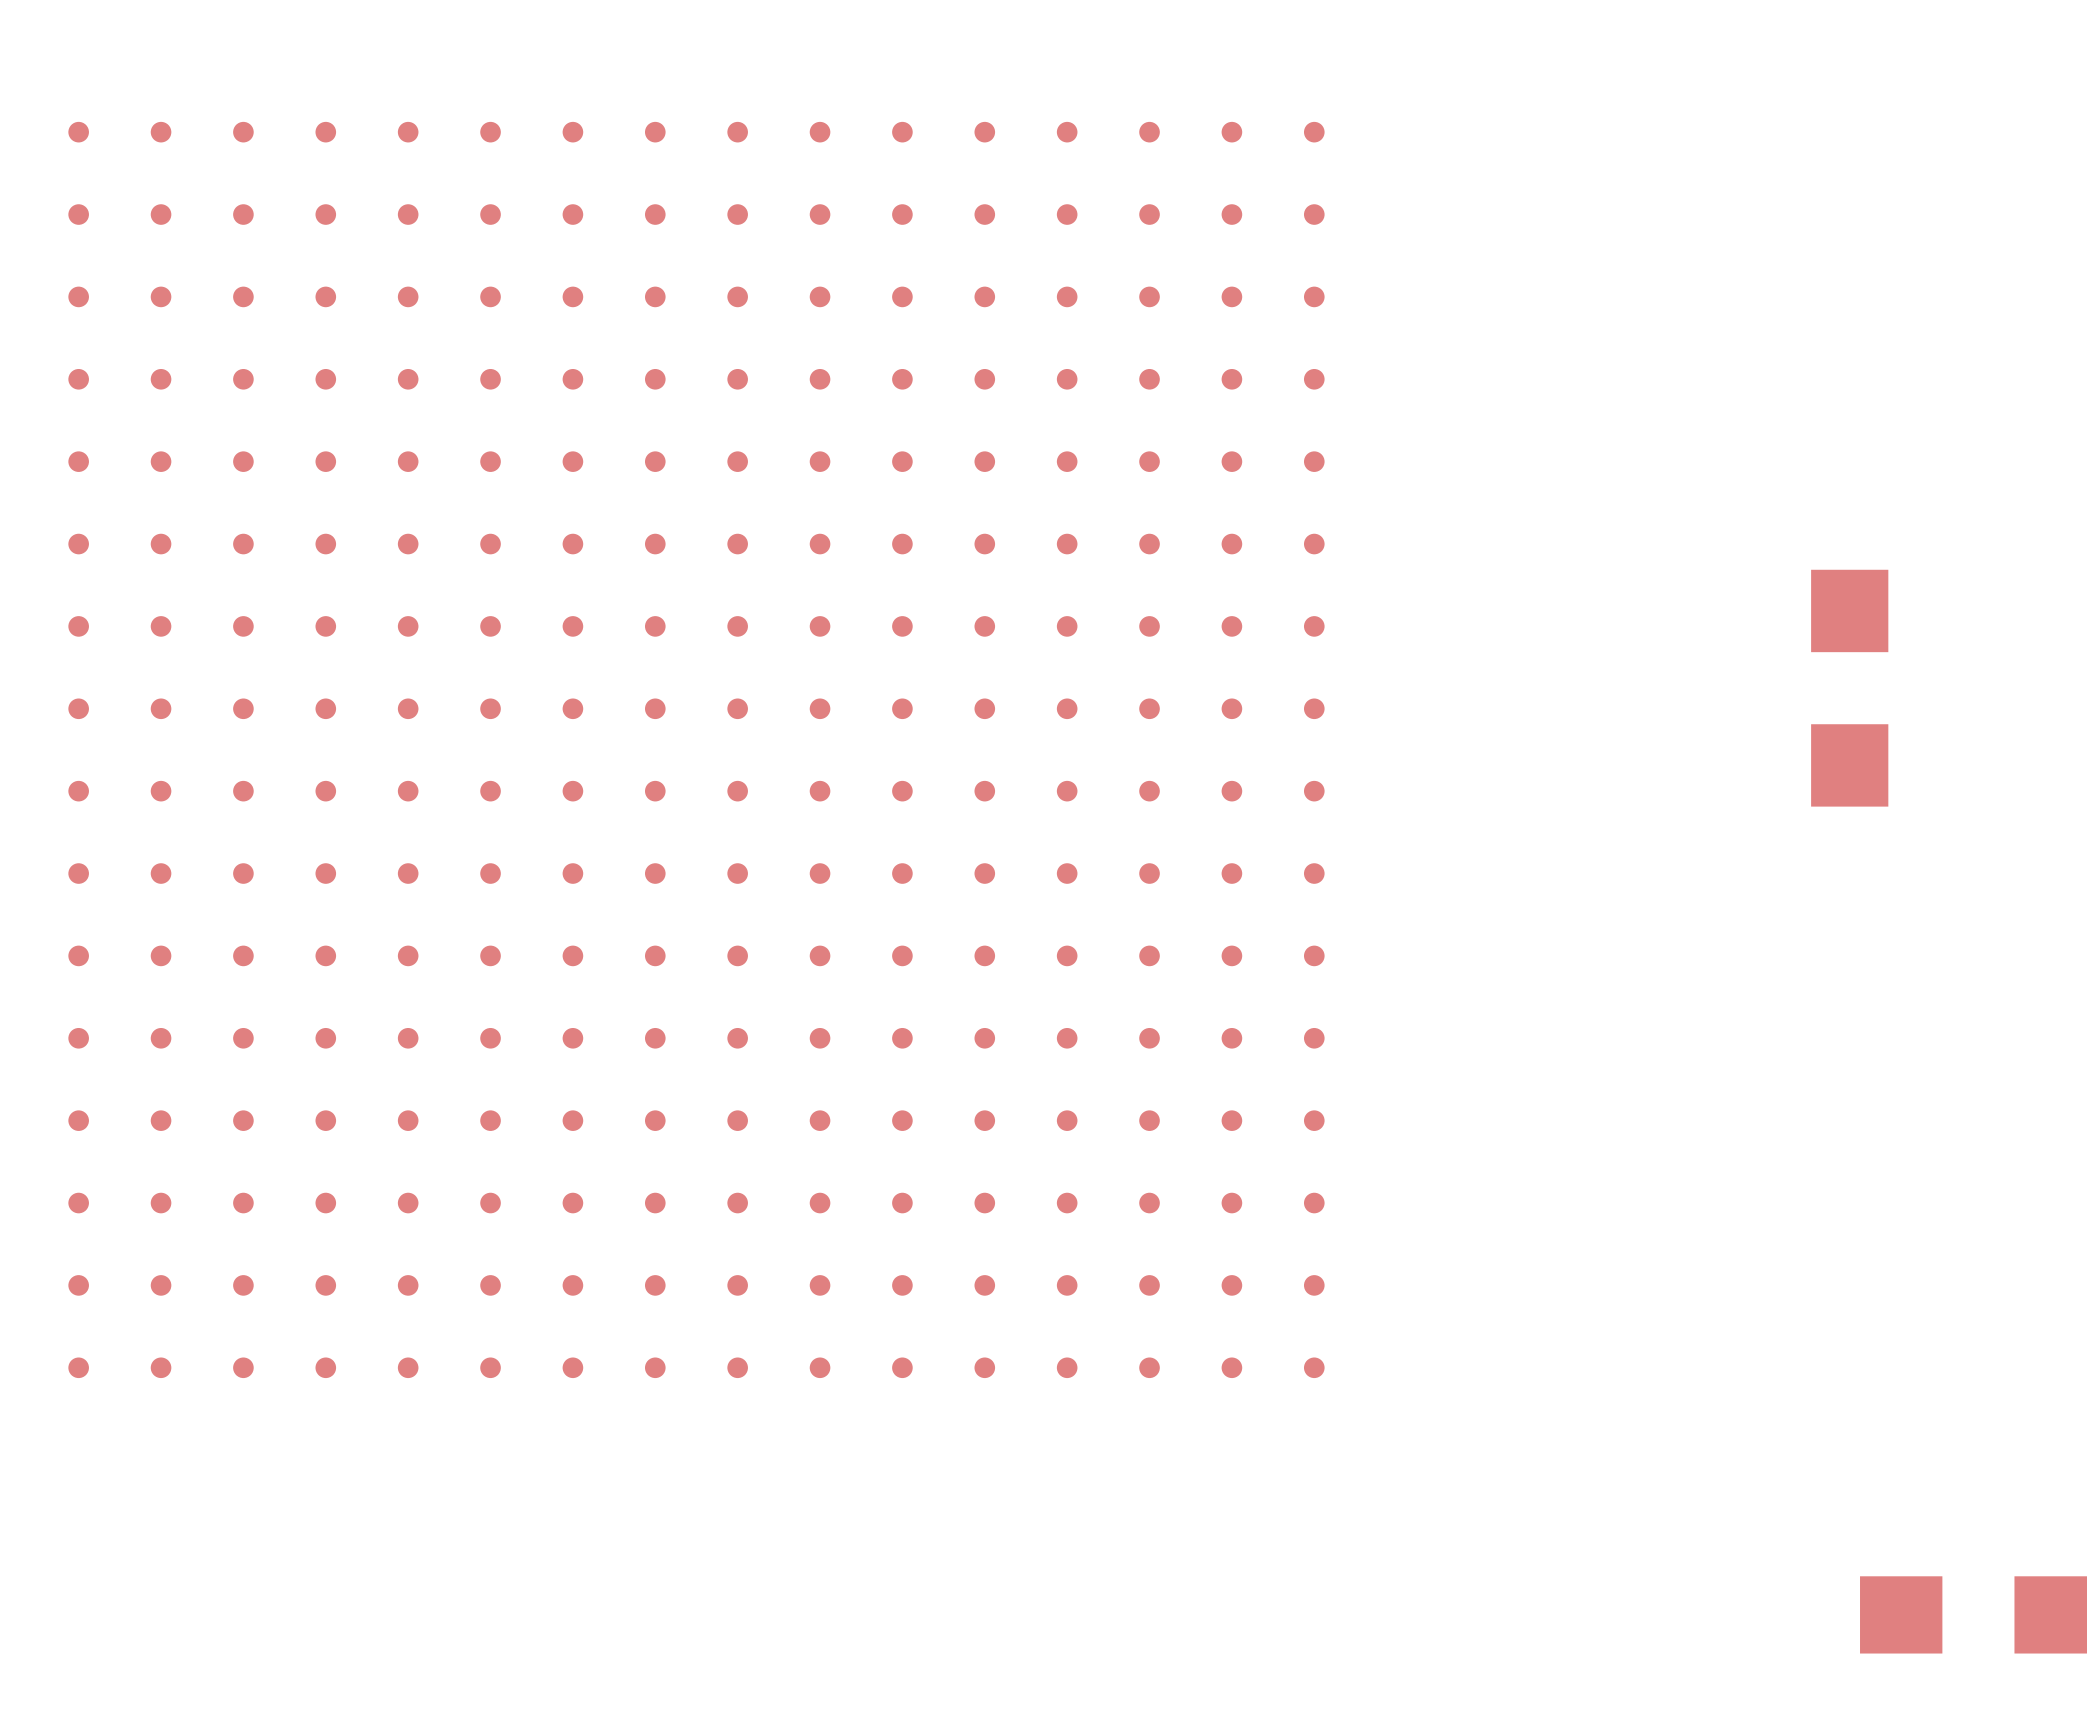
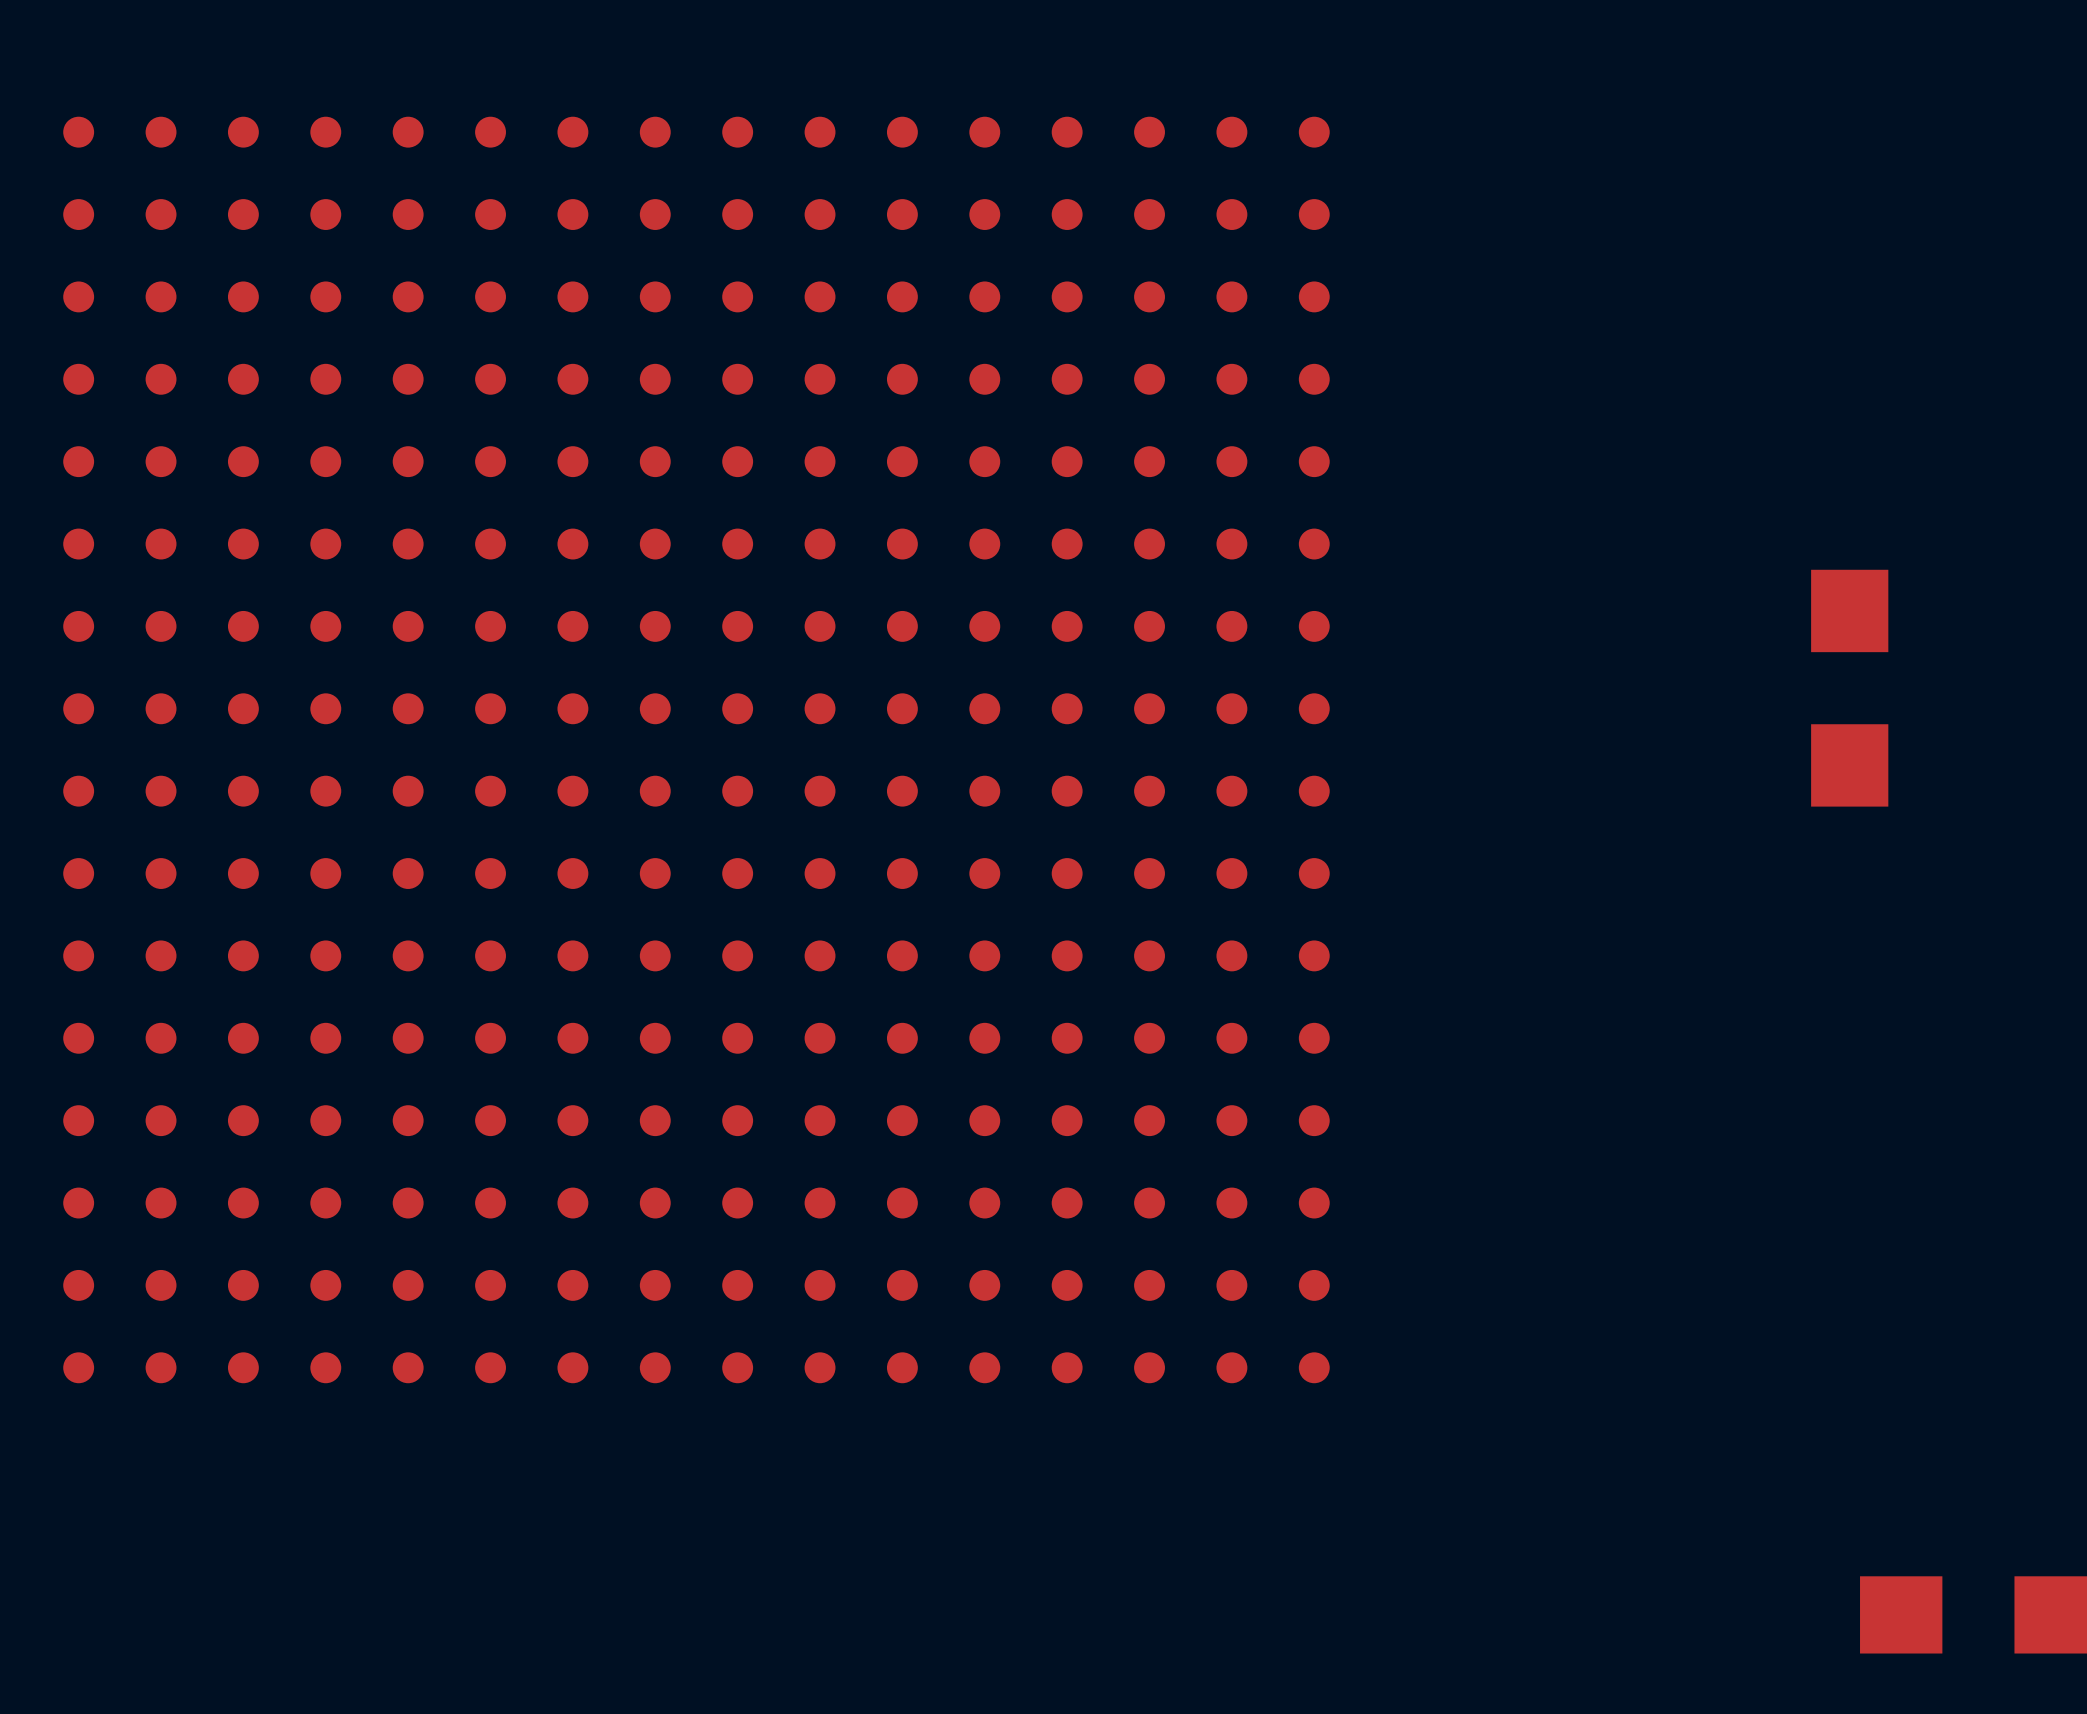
part footprint: [68, 121, 1325, 1379] -> [63, 116, 1330, 1384]

